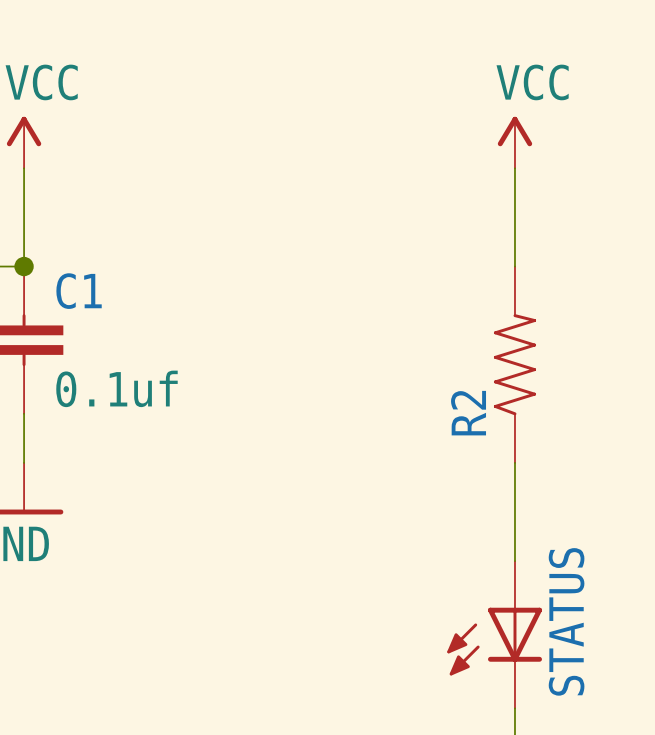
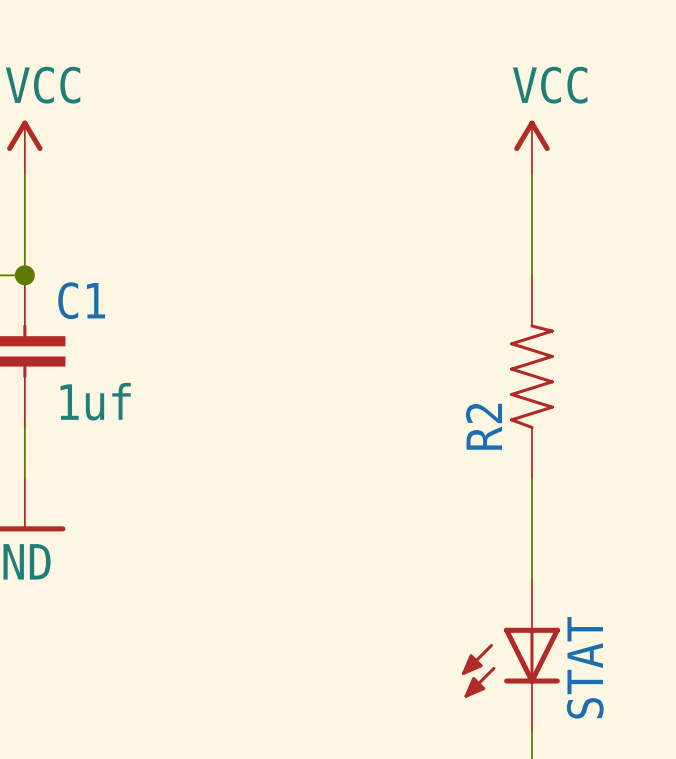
C1 value: 0.1uf (116, 388) -> 1uf (95, 401)
STATUS name: STATUS (566, 621) -> STAT (585, 667)

